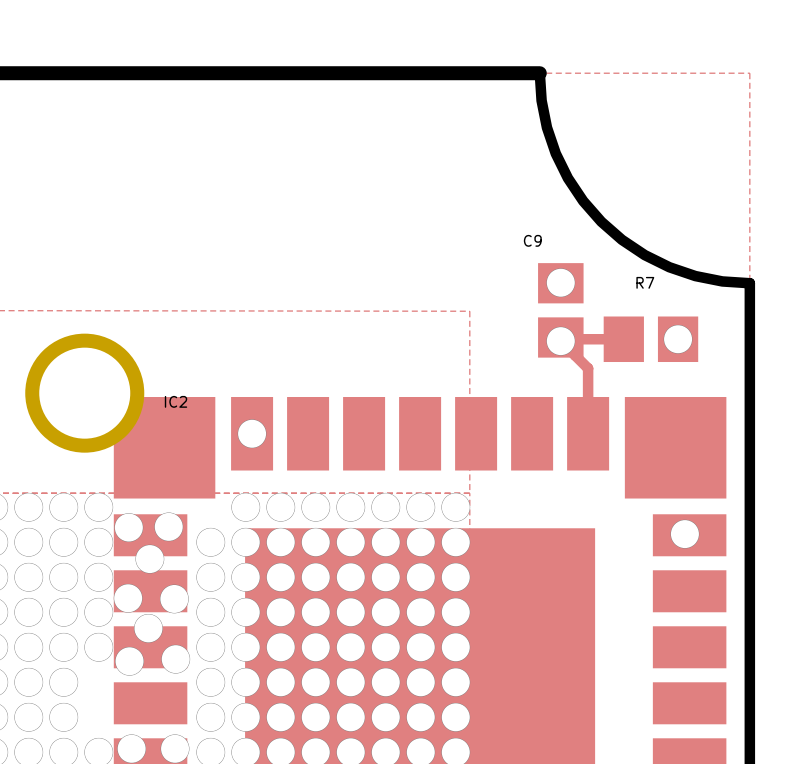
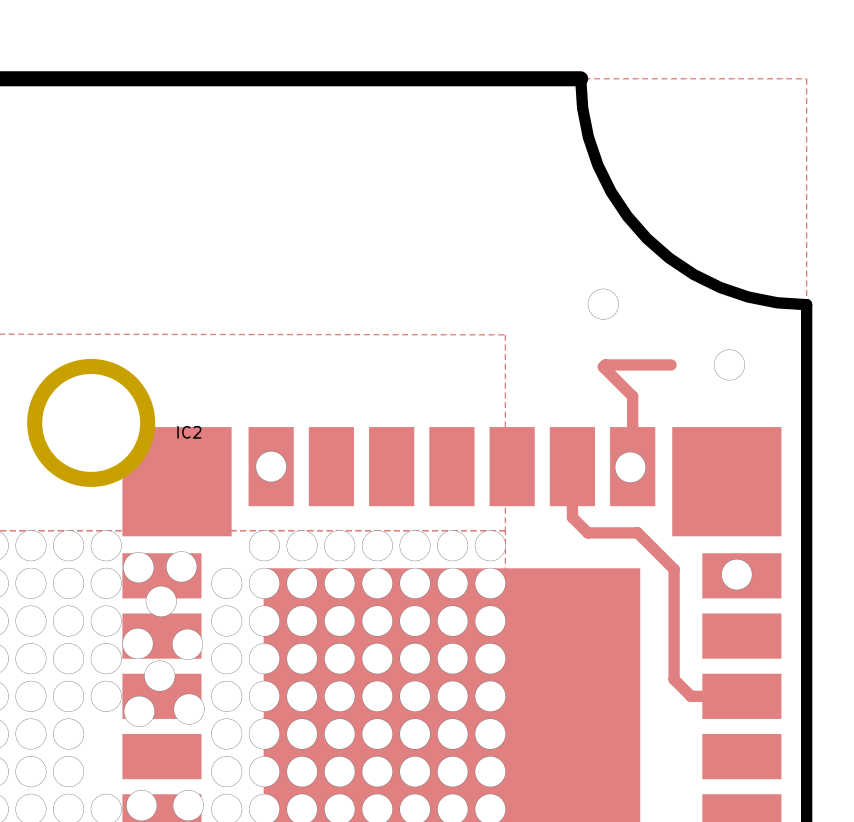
C9: (560, 310) -> none
R7: (650, 339) -> none
via position: (560, 341) -> (630, 467)
track: none -> (572, 466) (572, 517) (587, 532) (637, 532) (674, 569) (674, 679) (691, 696) (741, 696)

